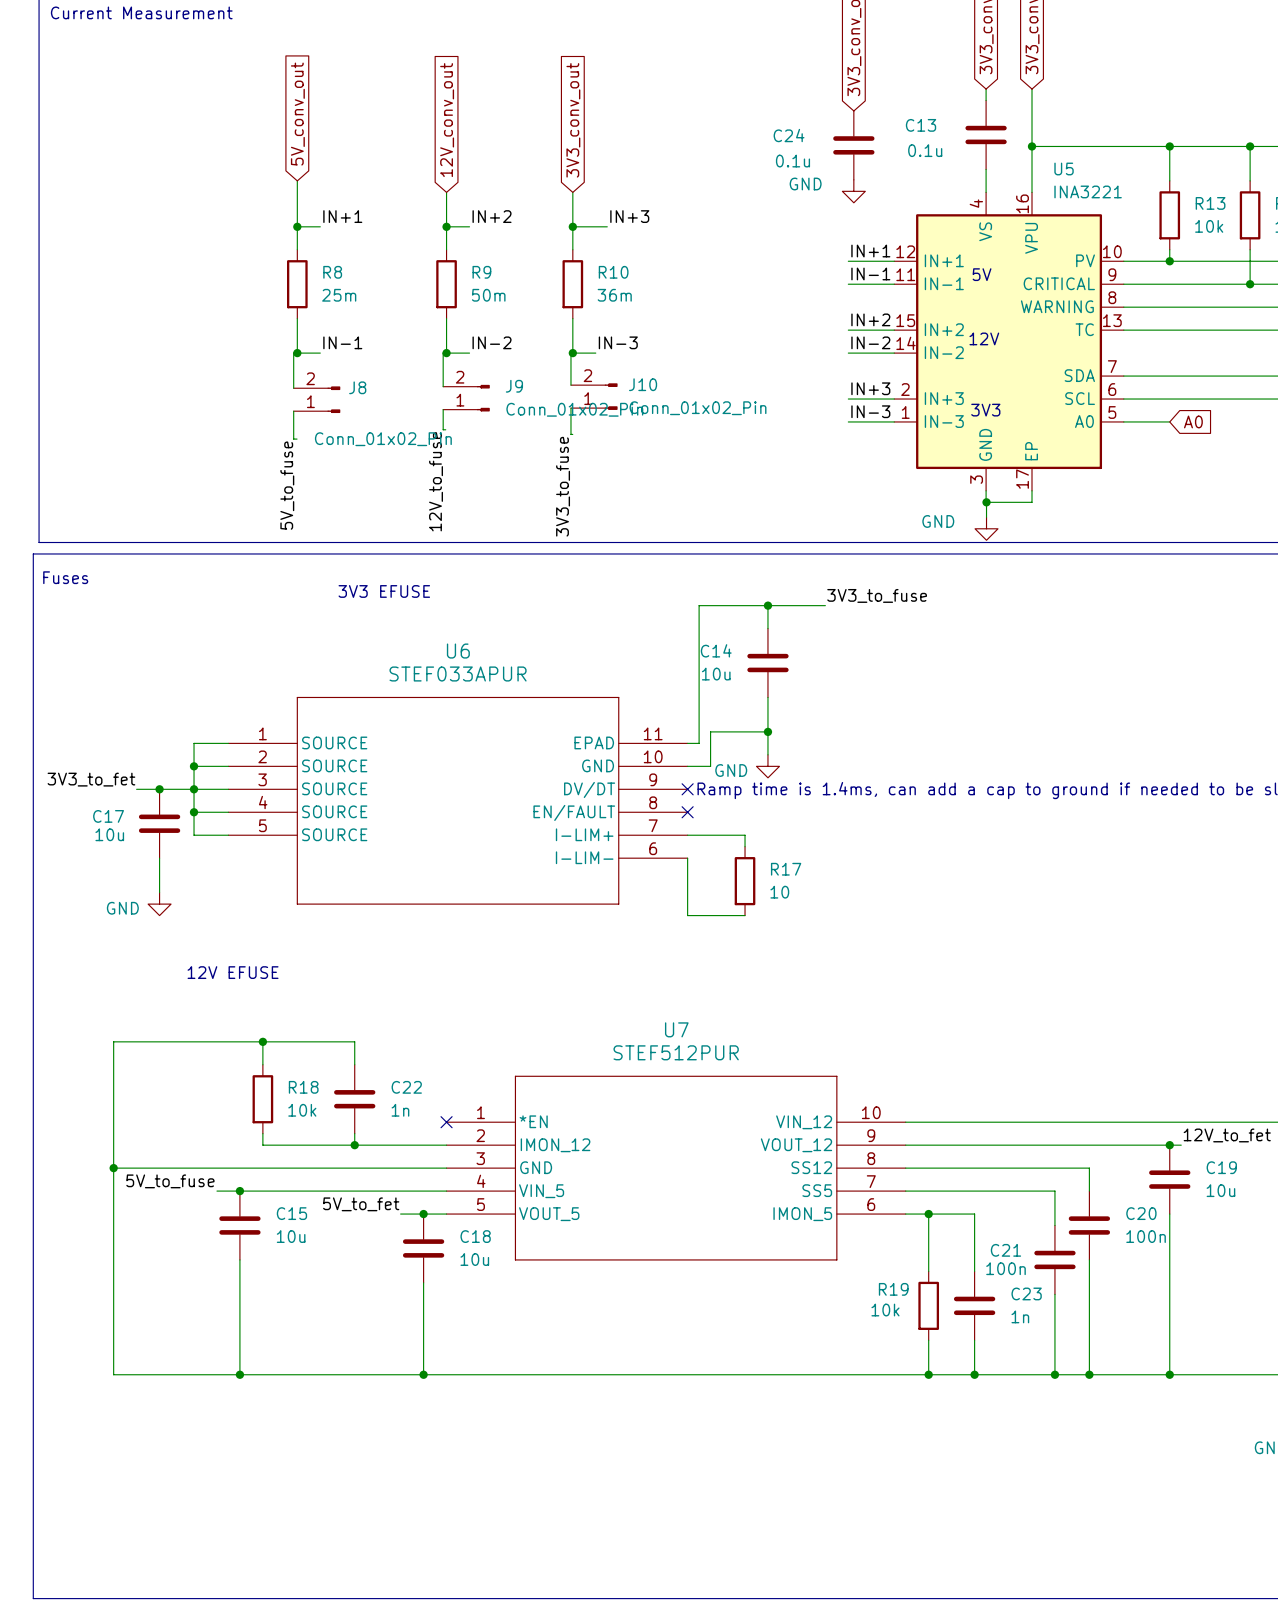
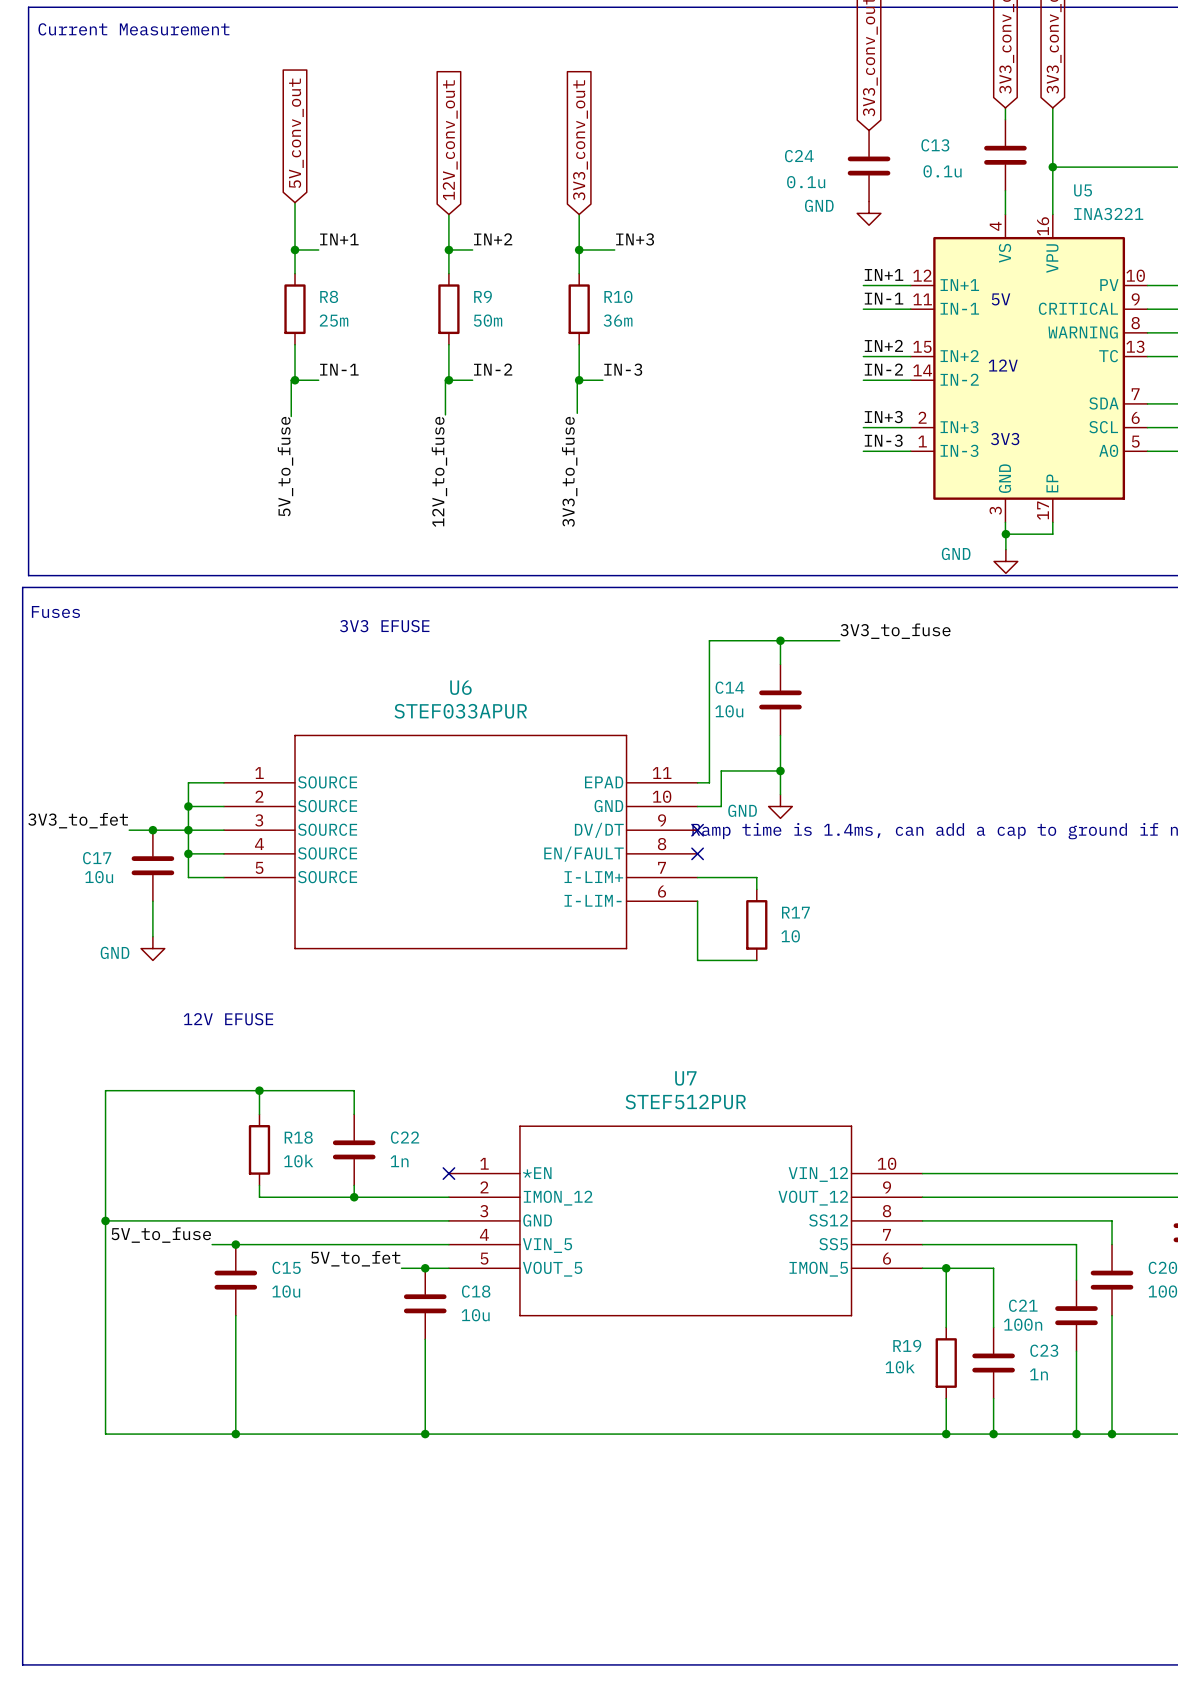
J10: Conn_01x02_Pin (594, 396) -> none
J9: Conn_01x02_Pin (466, 398) -> none
J8: Conn_01x02_Pin (316, 399) -> none
wire: (570, 408) (570, 434) (572, 434) -> none
wire: (443, 409) (443, 429) (445, 429) -> none
wire: (293, 411) (293, 439) (297, 439) -> none
label position: 12V_to_fuse (436, 481) -> 12V_to_fuse (439, 471)
label position: 5V_to_fuse (287, 485) -> 5V_to_fuse (285, 466)
label position: 3V3_to_fuse (563, 486) -> 3V3_to_fuse (569, 471)

